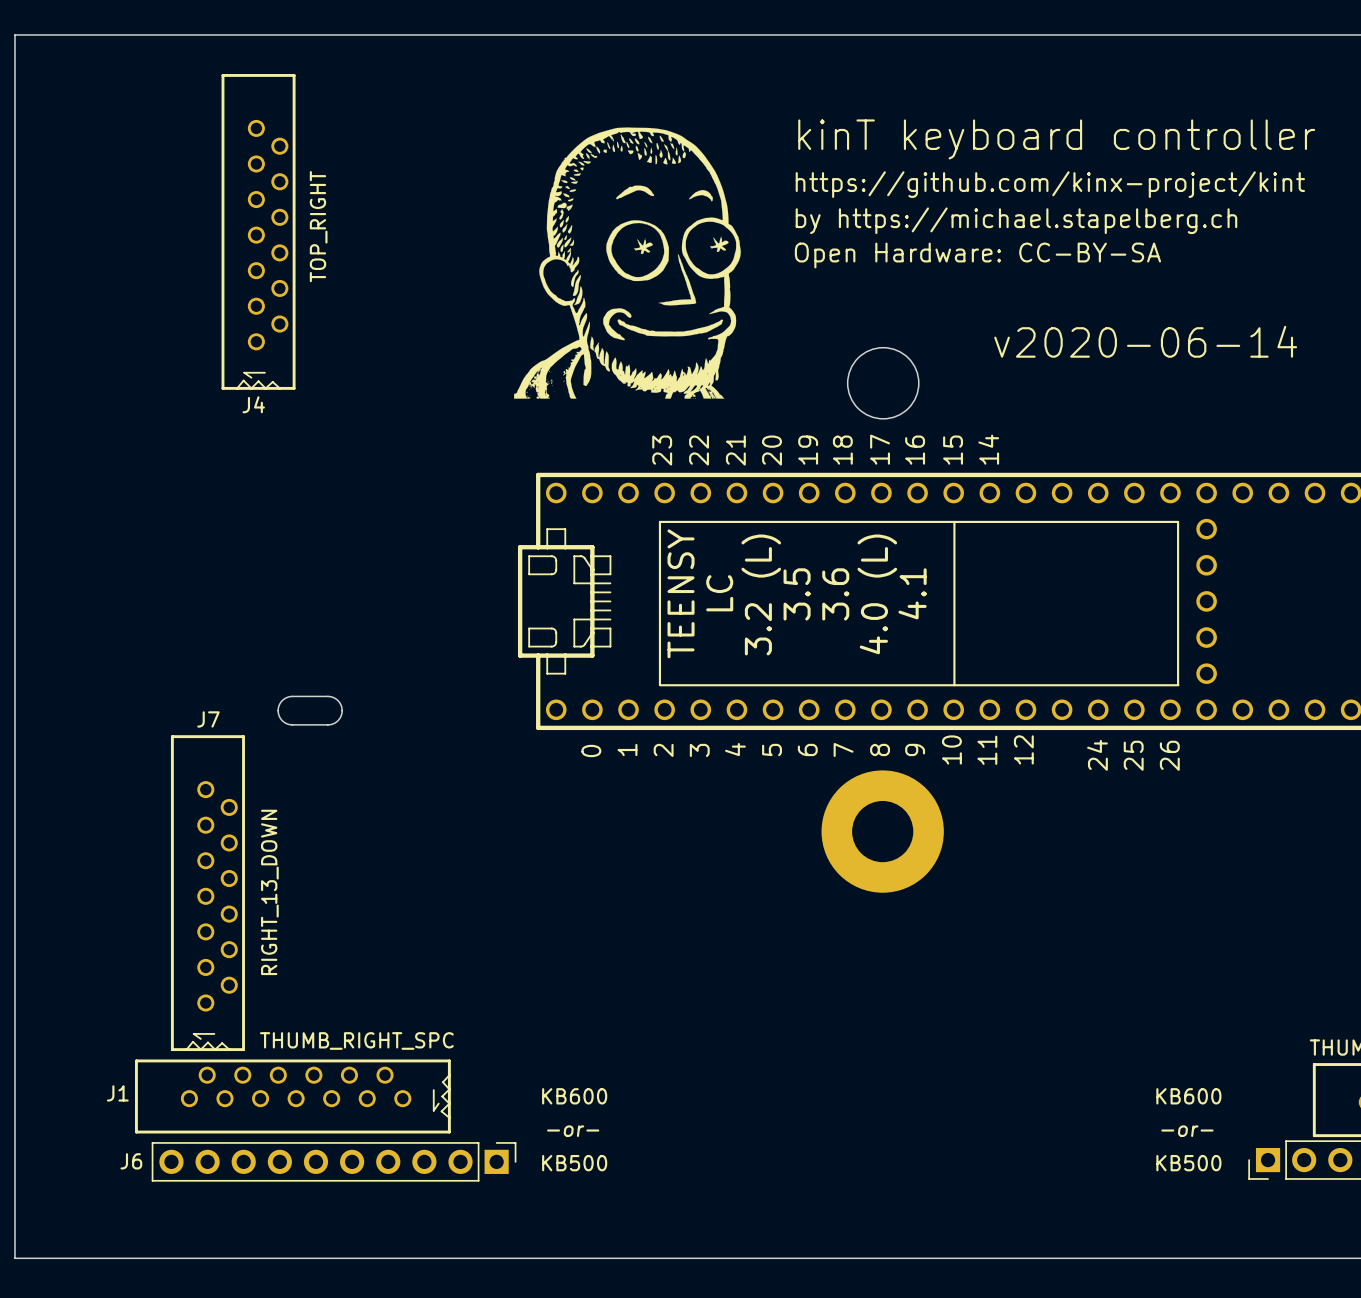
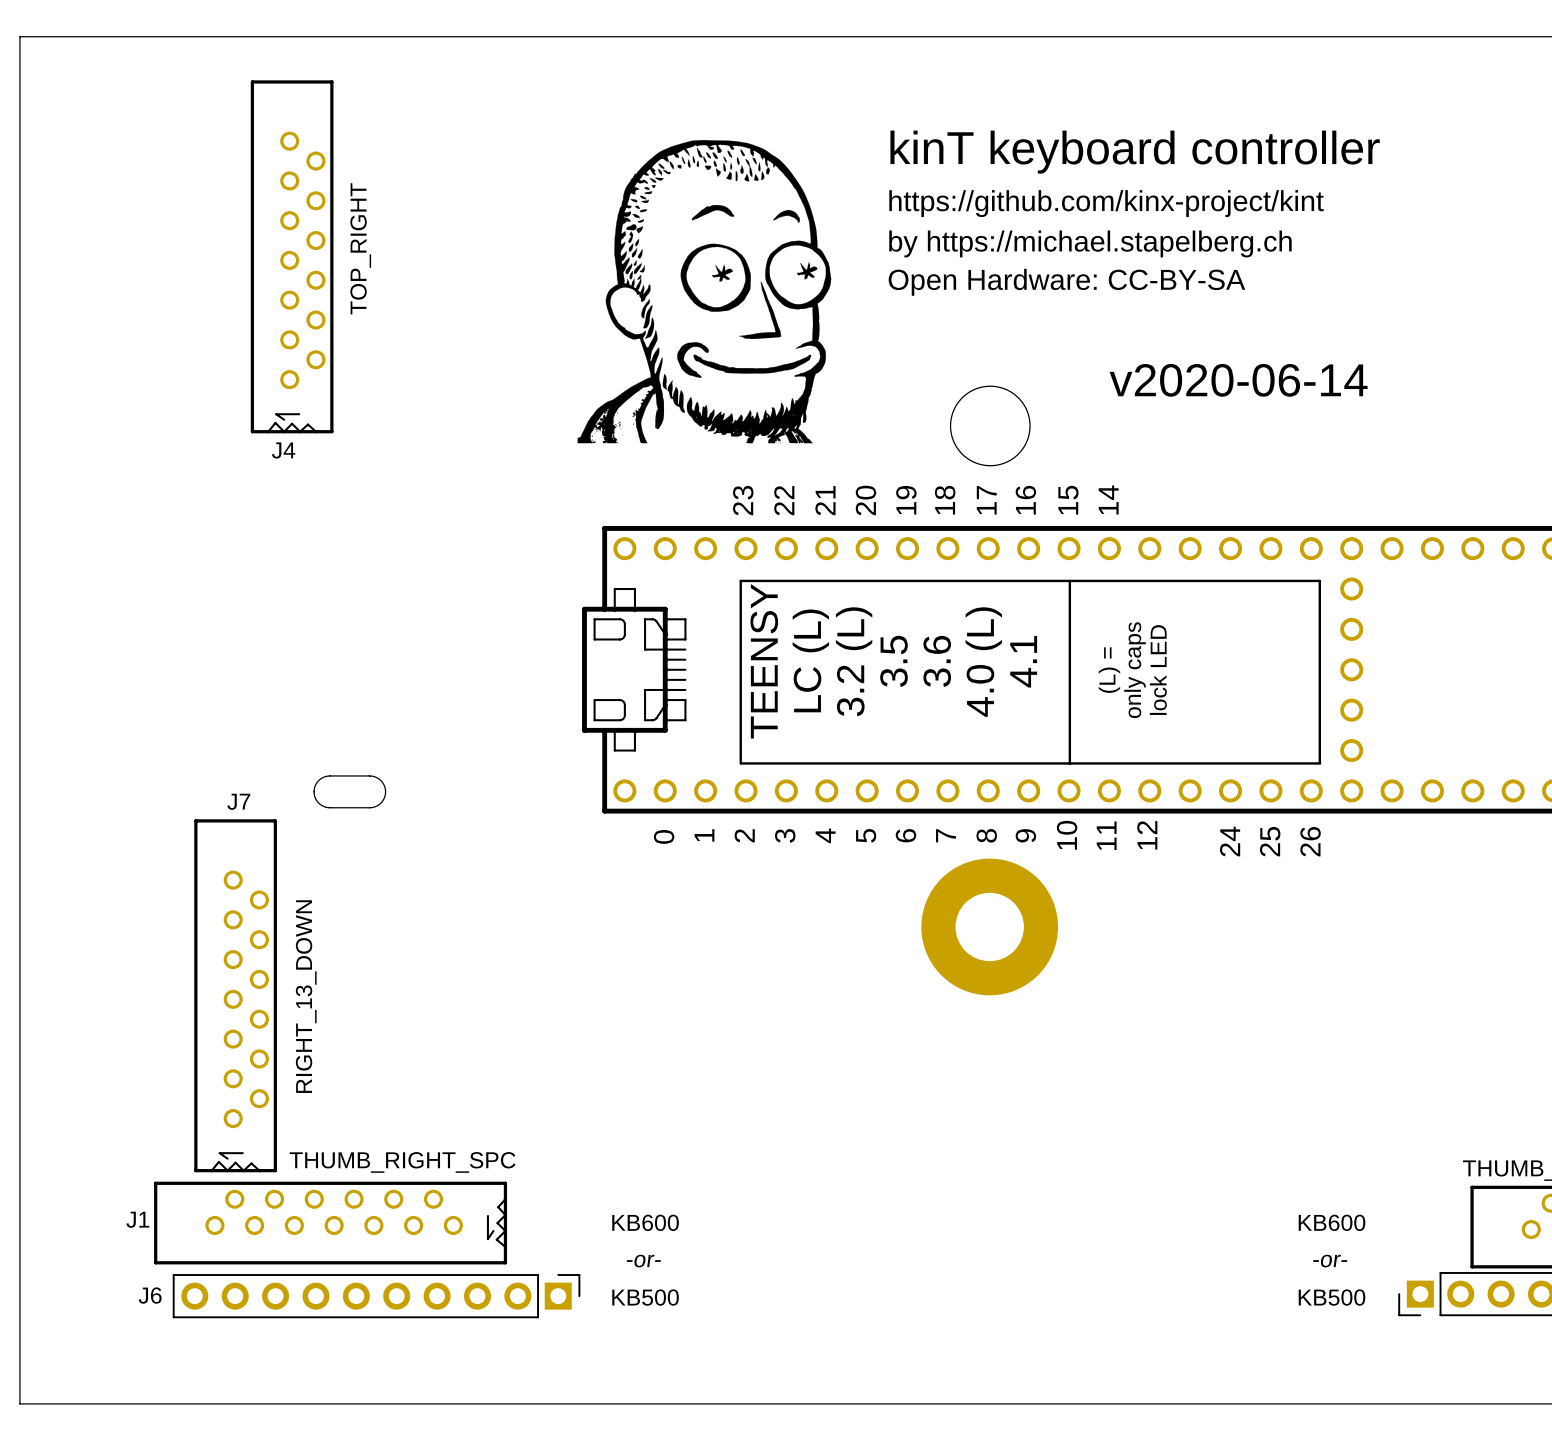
part text: LC (719, 593) -> LC (L) (810, 660)
text: none -> (L) = (1109, 670)
text: none -> only caps (1135, 670)
text: none -> lock LED (1158, 670)

